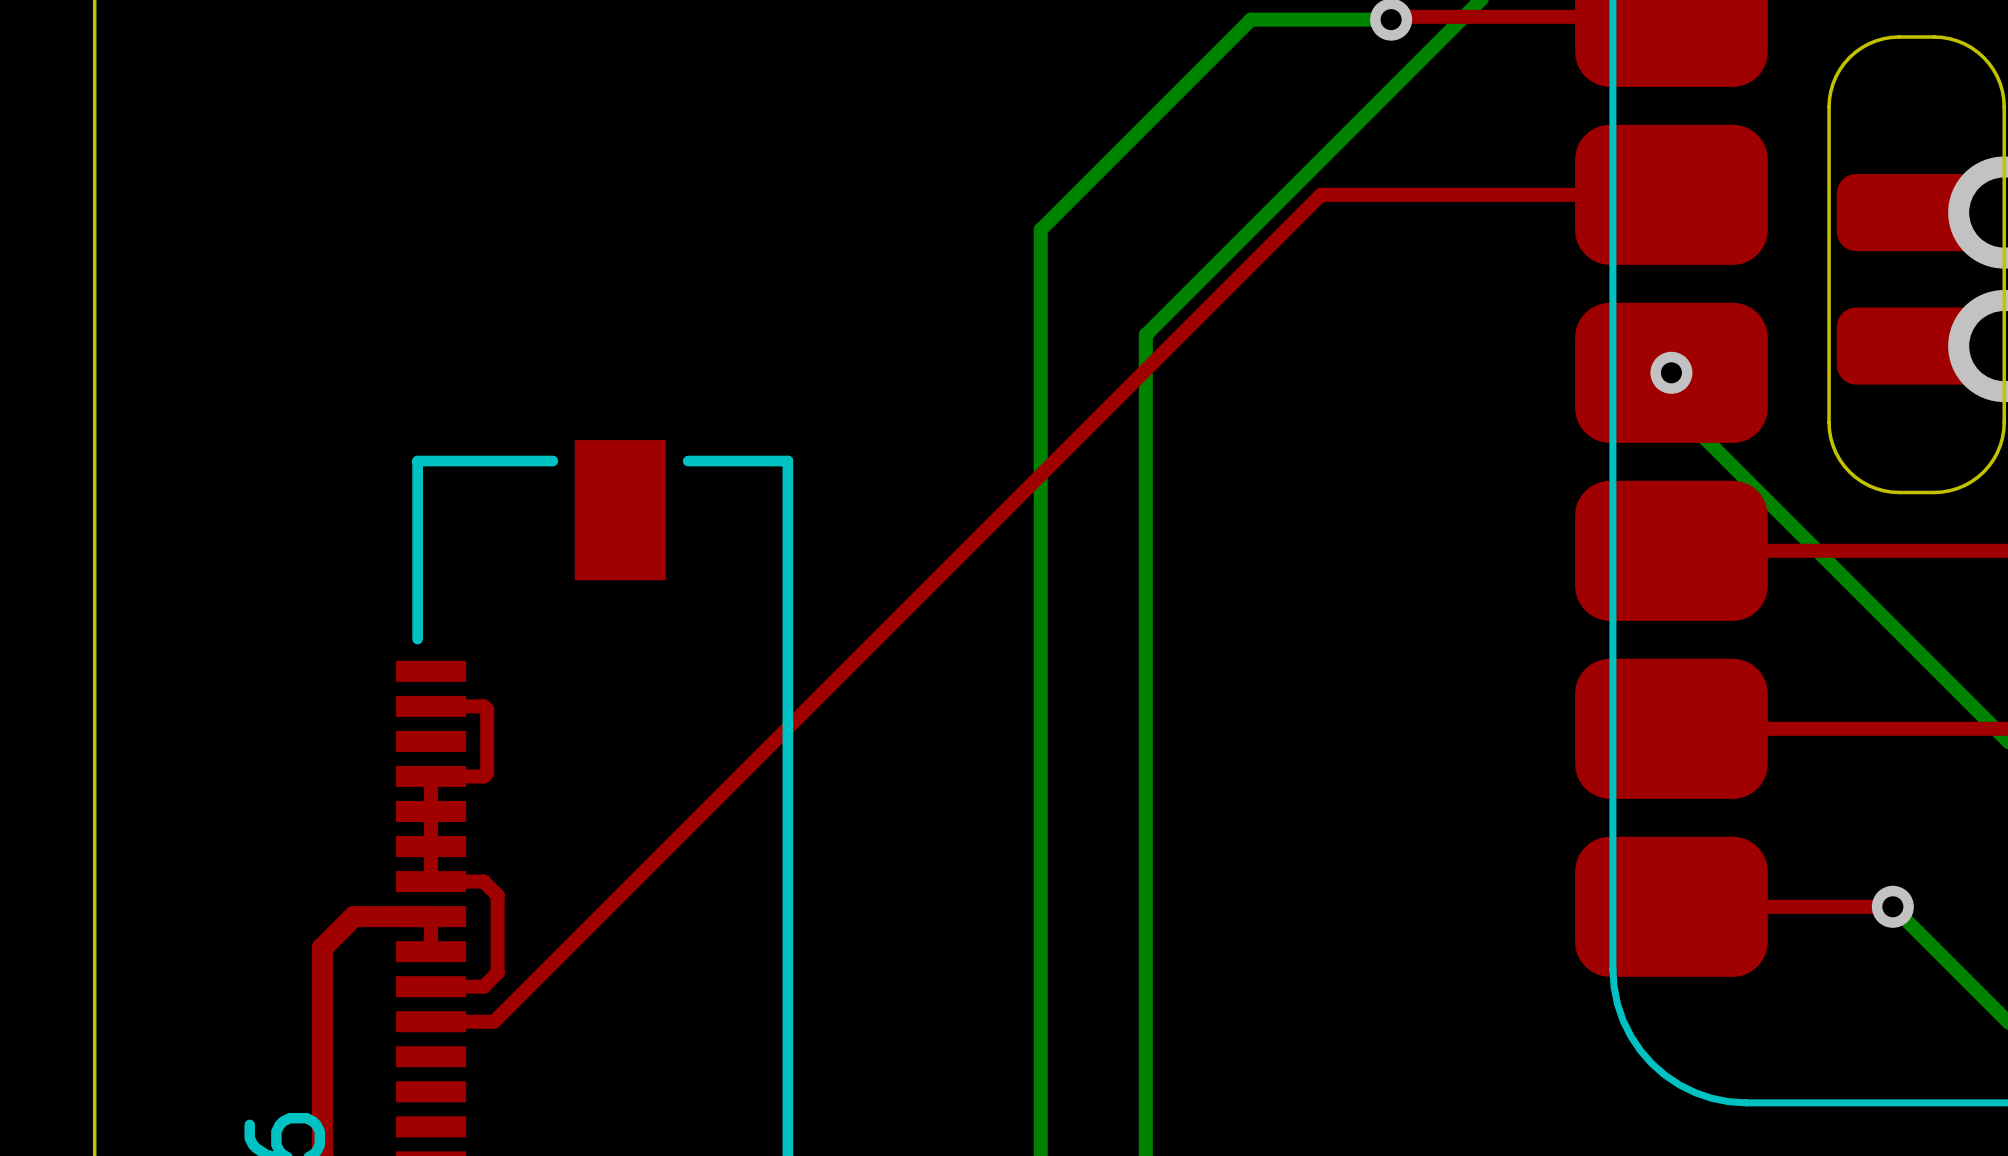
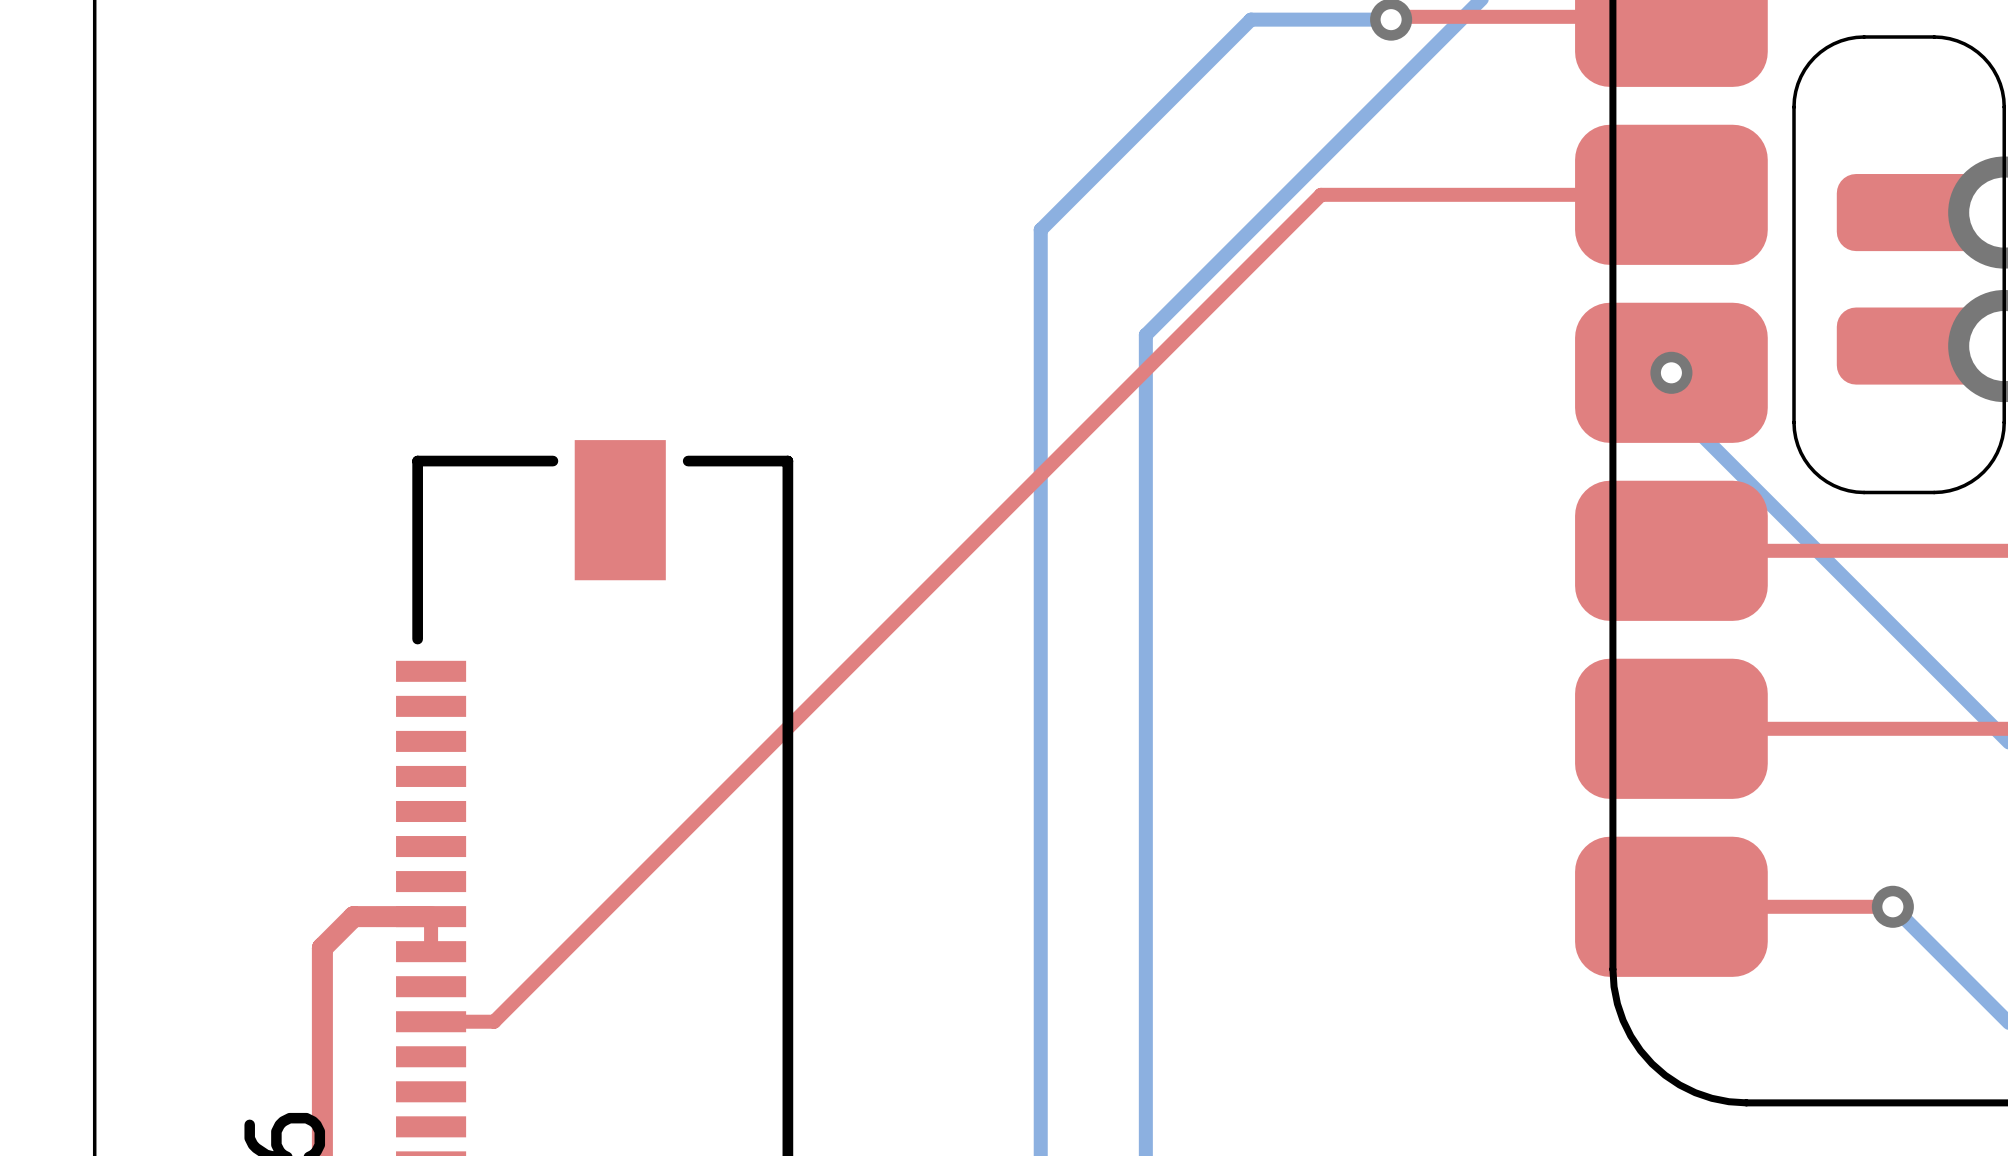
board edge: (1899, 37) (1875, 40) (1861, 47) (1849, 57) (1839, 69) (1832, 83) (1829, 107) (1829, 422) (1830, 438) (1839, 459) (1855, 477) (1875, 488) (1899, 492) -> (1899, 37) (1856, 37) (1840, 40) (1826, 47) (1814, 57) (1800, 76) (1795, 91) (1794, 107) (1794, 422) (1795, 438) (1800, 452) (1809, 466) (1820, 477) (1833, 485) (1856, 492) (1899, 492)
top track: (431, 706) (483, 706) (487, 709) (487, 773) (483, 776) (431, 776) (431, 881) (483, 881) (497, 895) (497, 972) (483, 986) (431, 986) -> none

